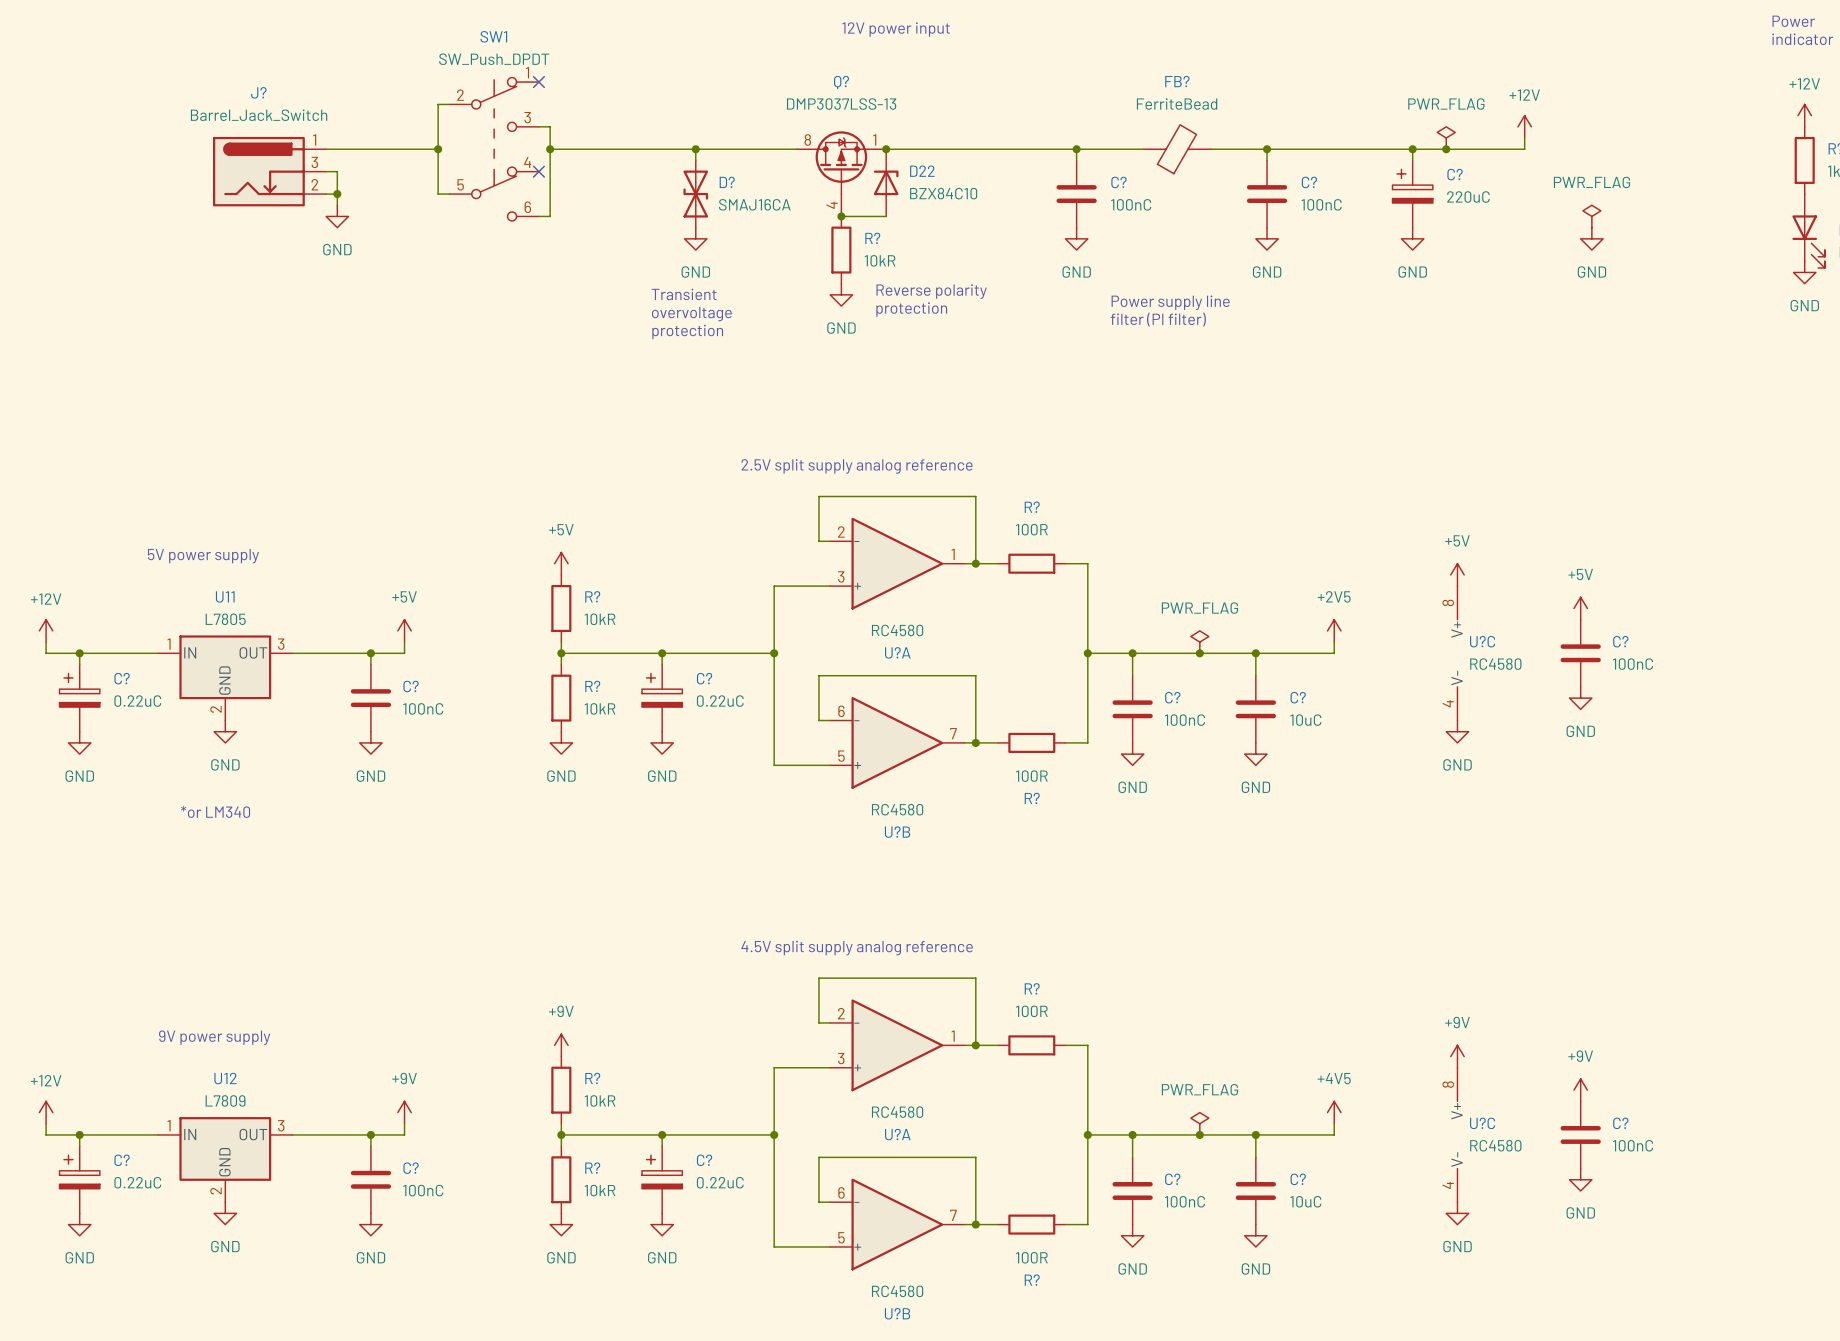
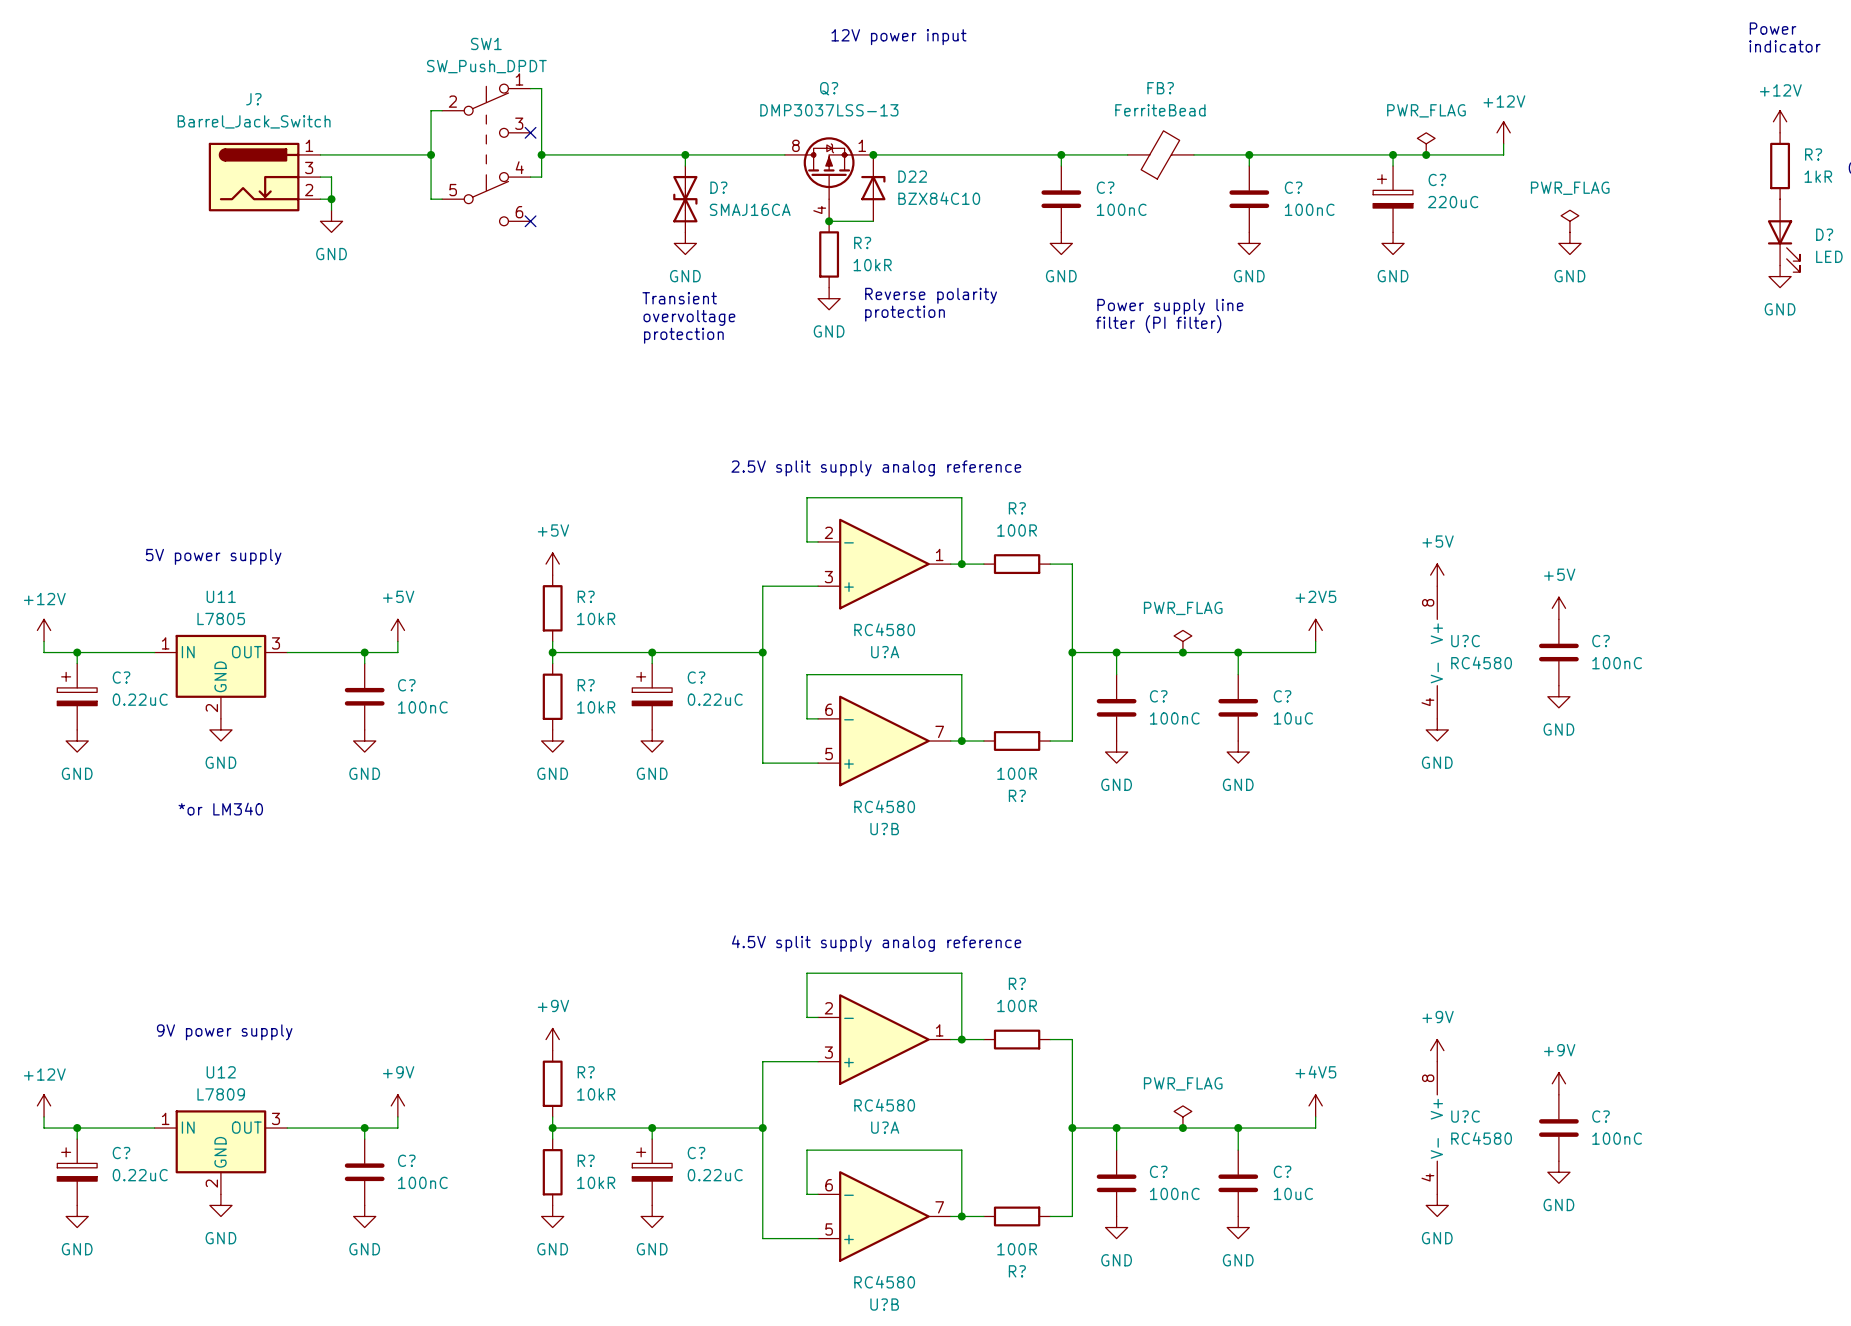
no-connect mark: (538, 82) -> none
wire: (538, 126) (550, 126) -> (530, 88) (541, 88) (541, 132)
no-connect mark: none -> (530, 132)
no-connect mark: (538, 171) -> none
wire: (550, 171) (550, 216) (538, 216) -> (541, 177) (530, 177)
no-connect mark: none -> (530, 221)

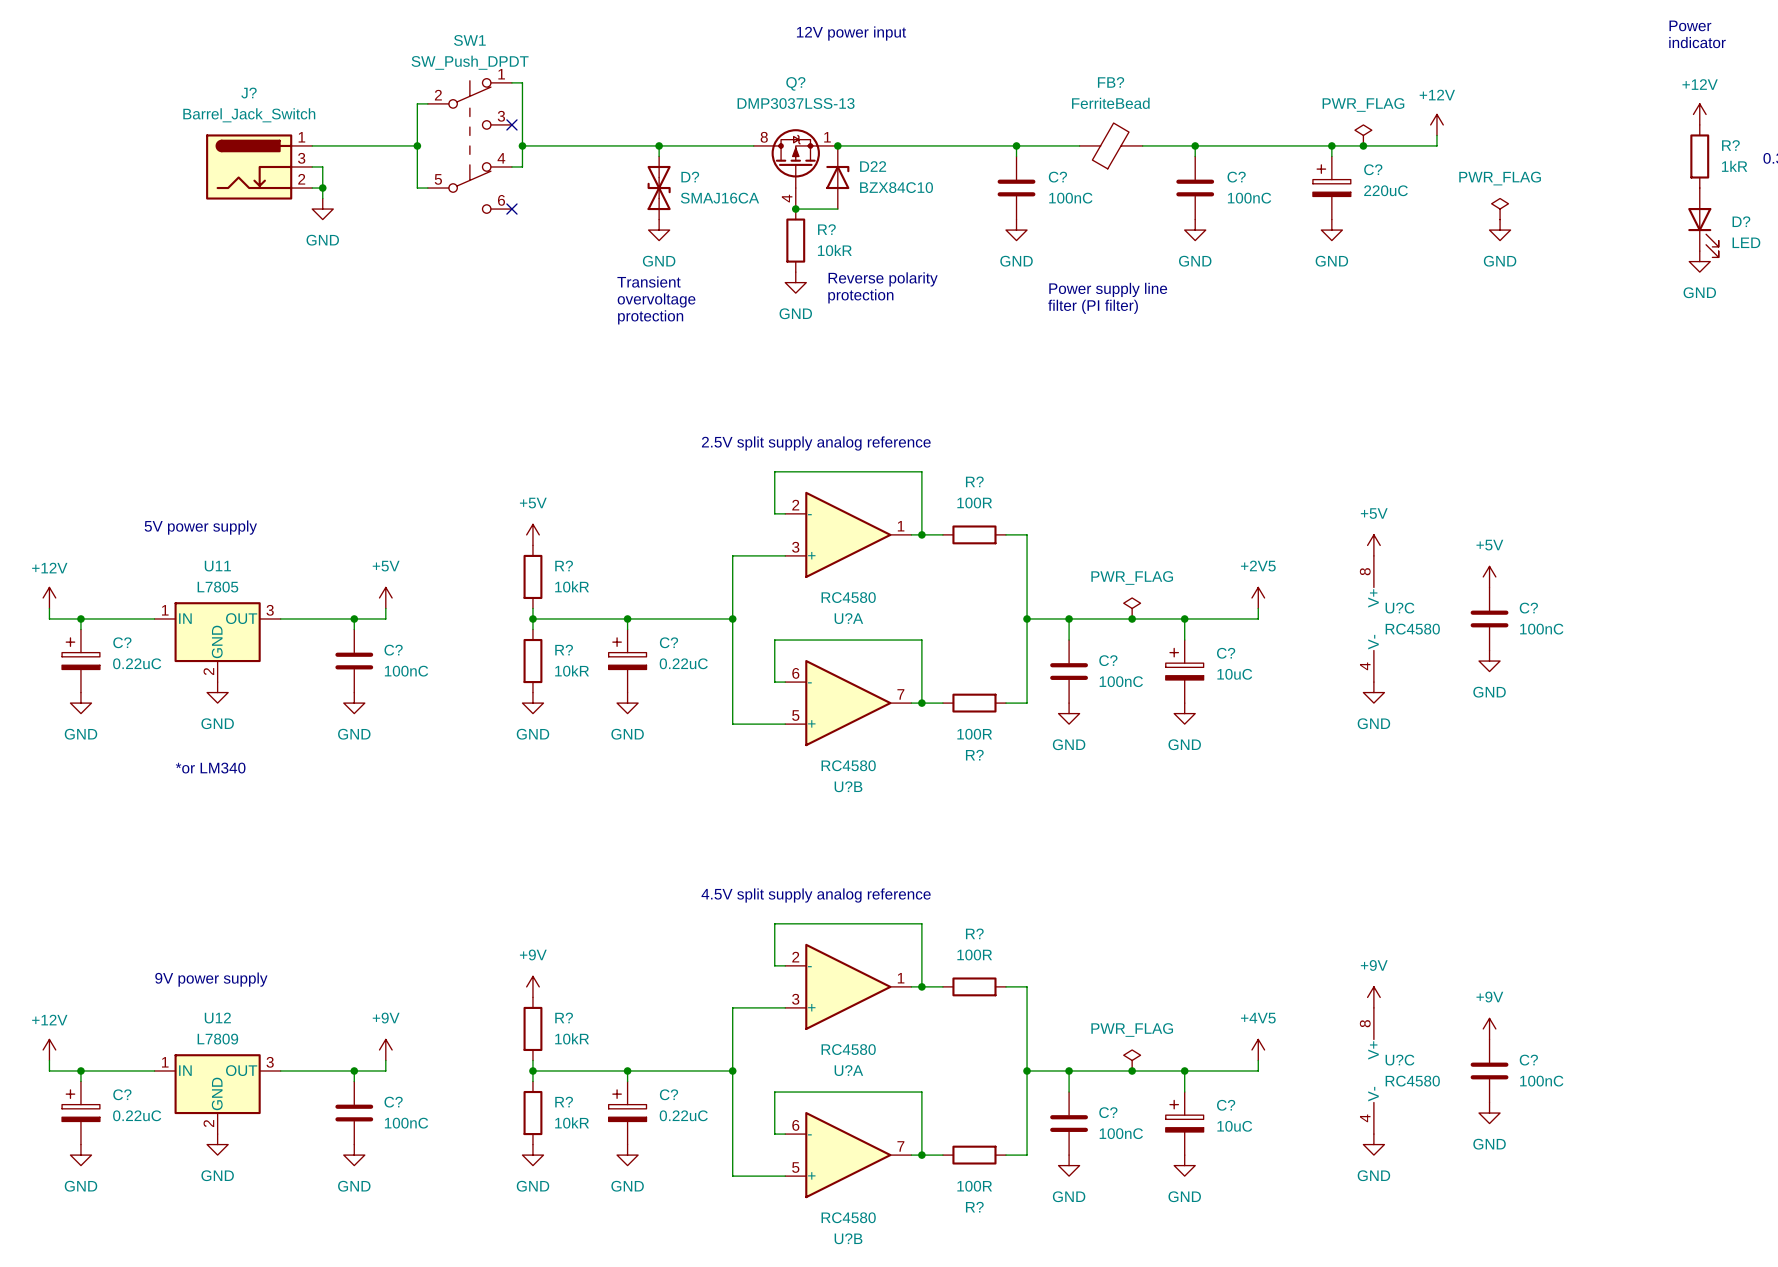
C? symbol: [1218, 674, 1259, 742] -> [1165, 640, 1204, 704]
C? symbol: [1218, 1150, 1259, 1217] -> [1165, 1092, 1204, 1156]

